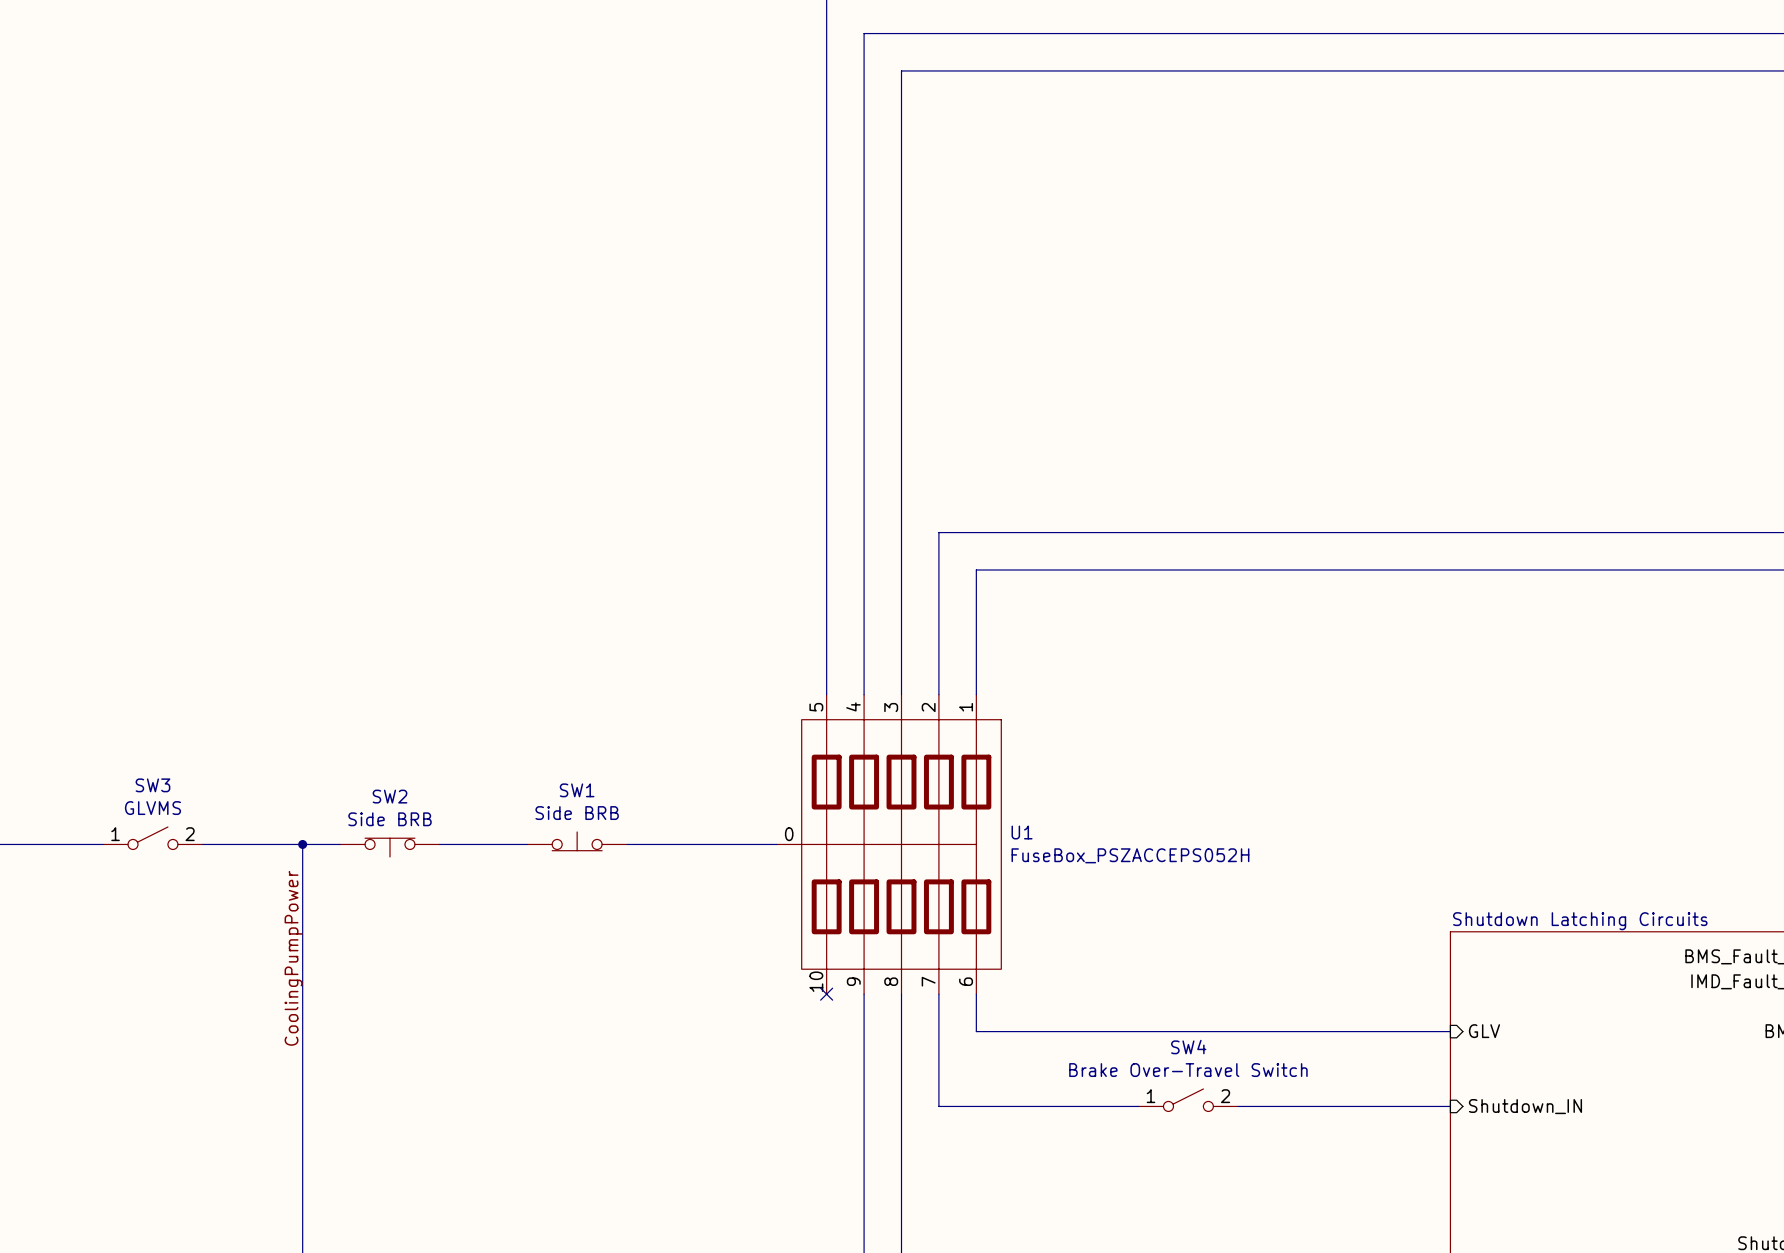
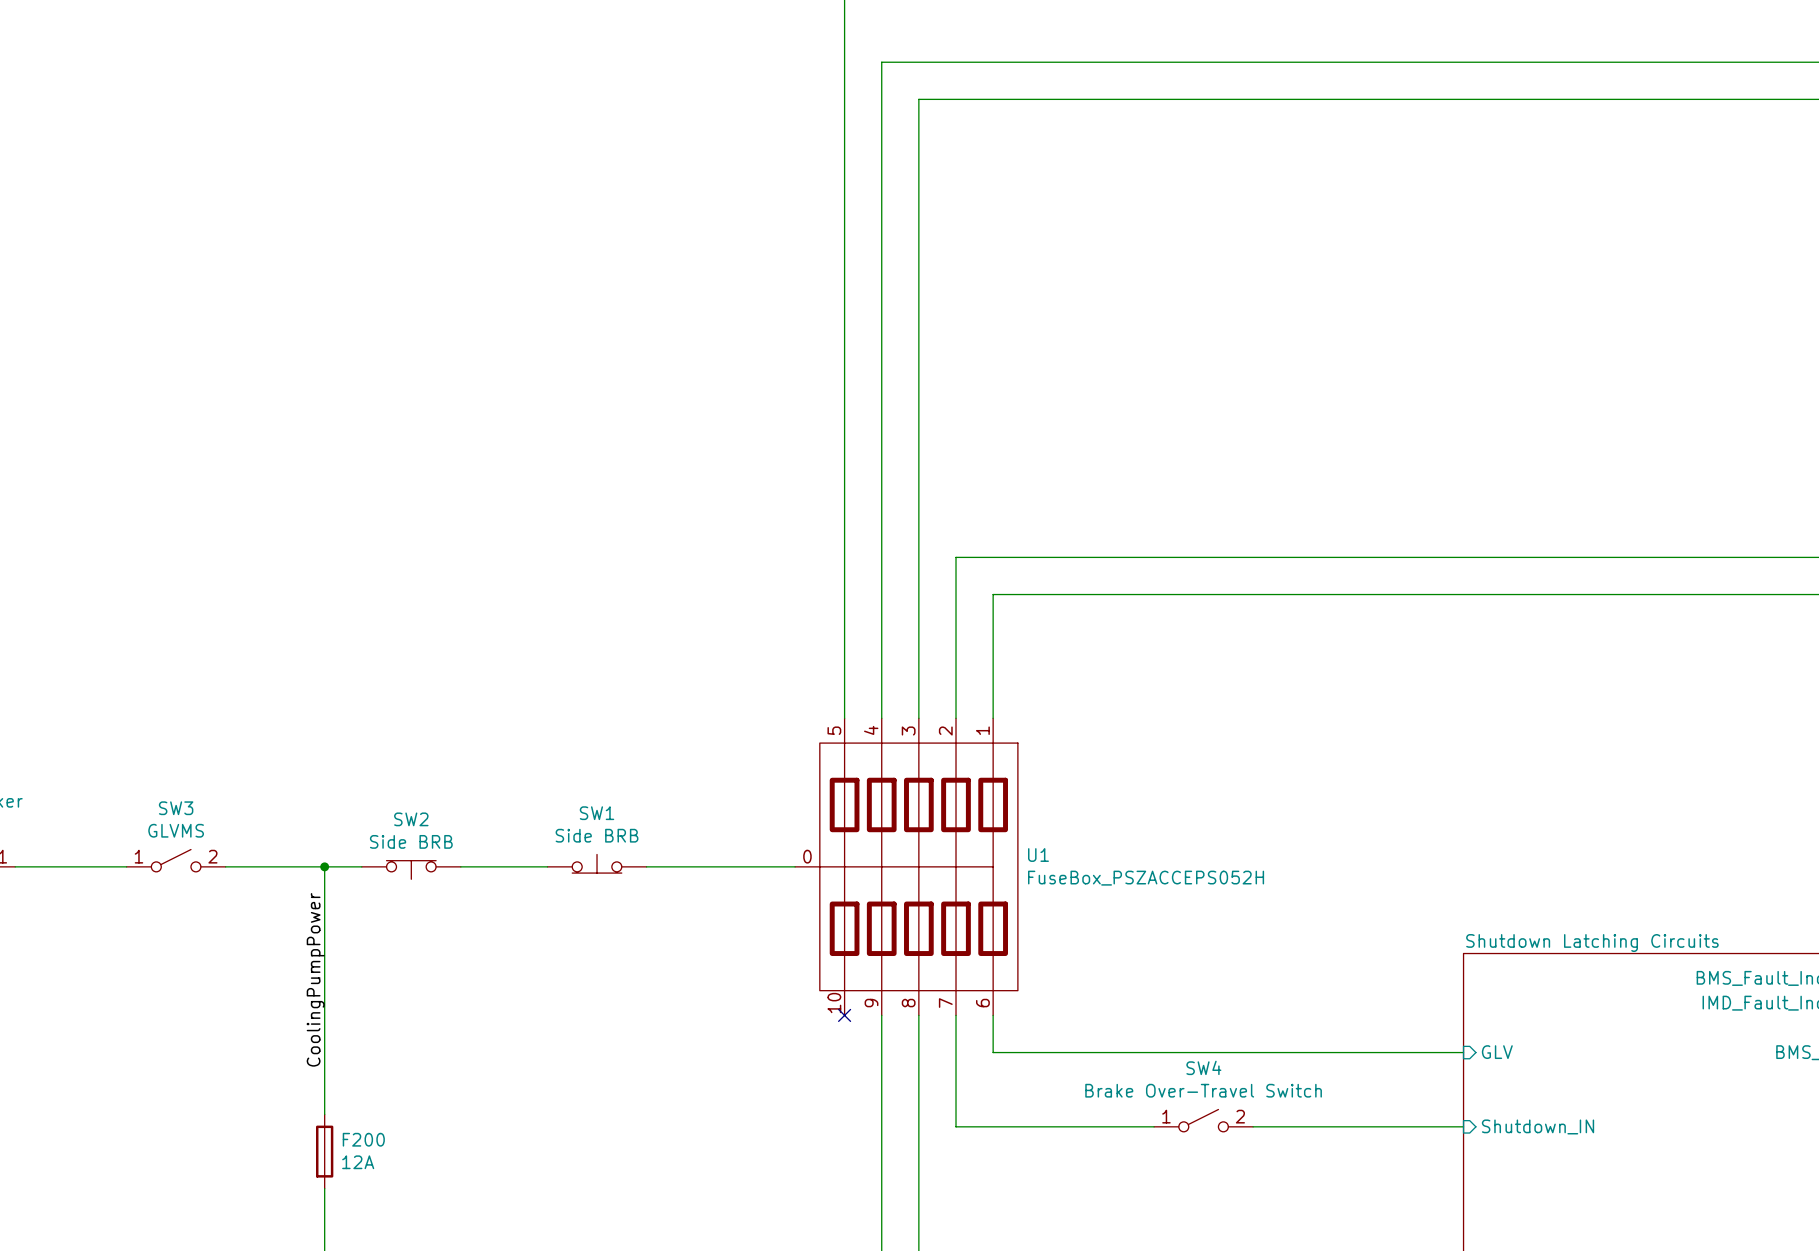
F200: none -> 12A (324, 1151)

